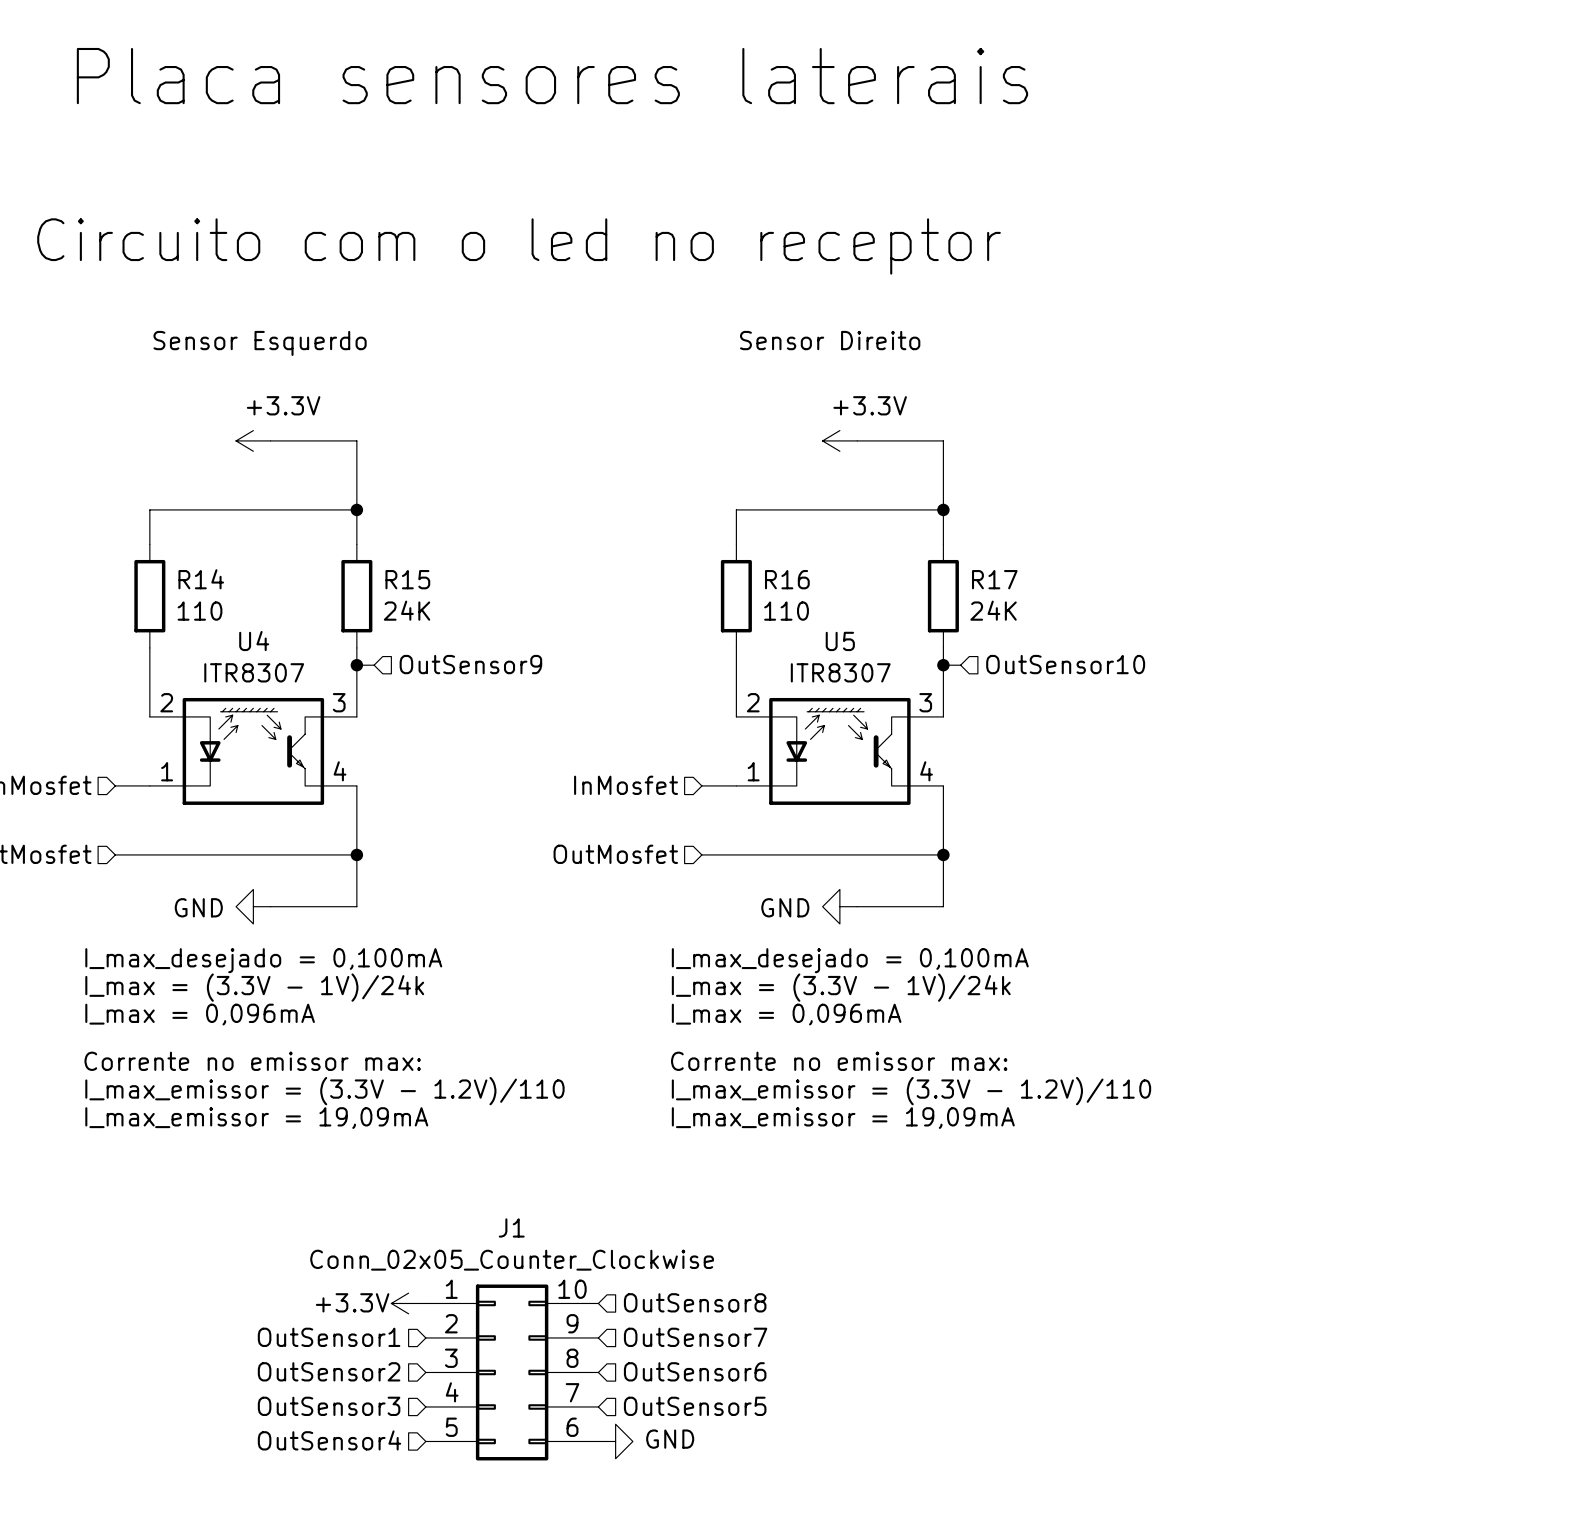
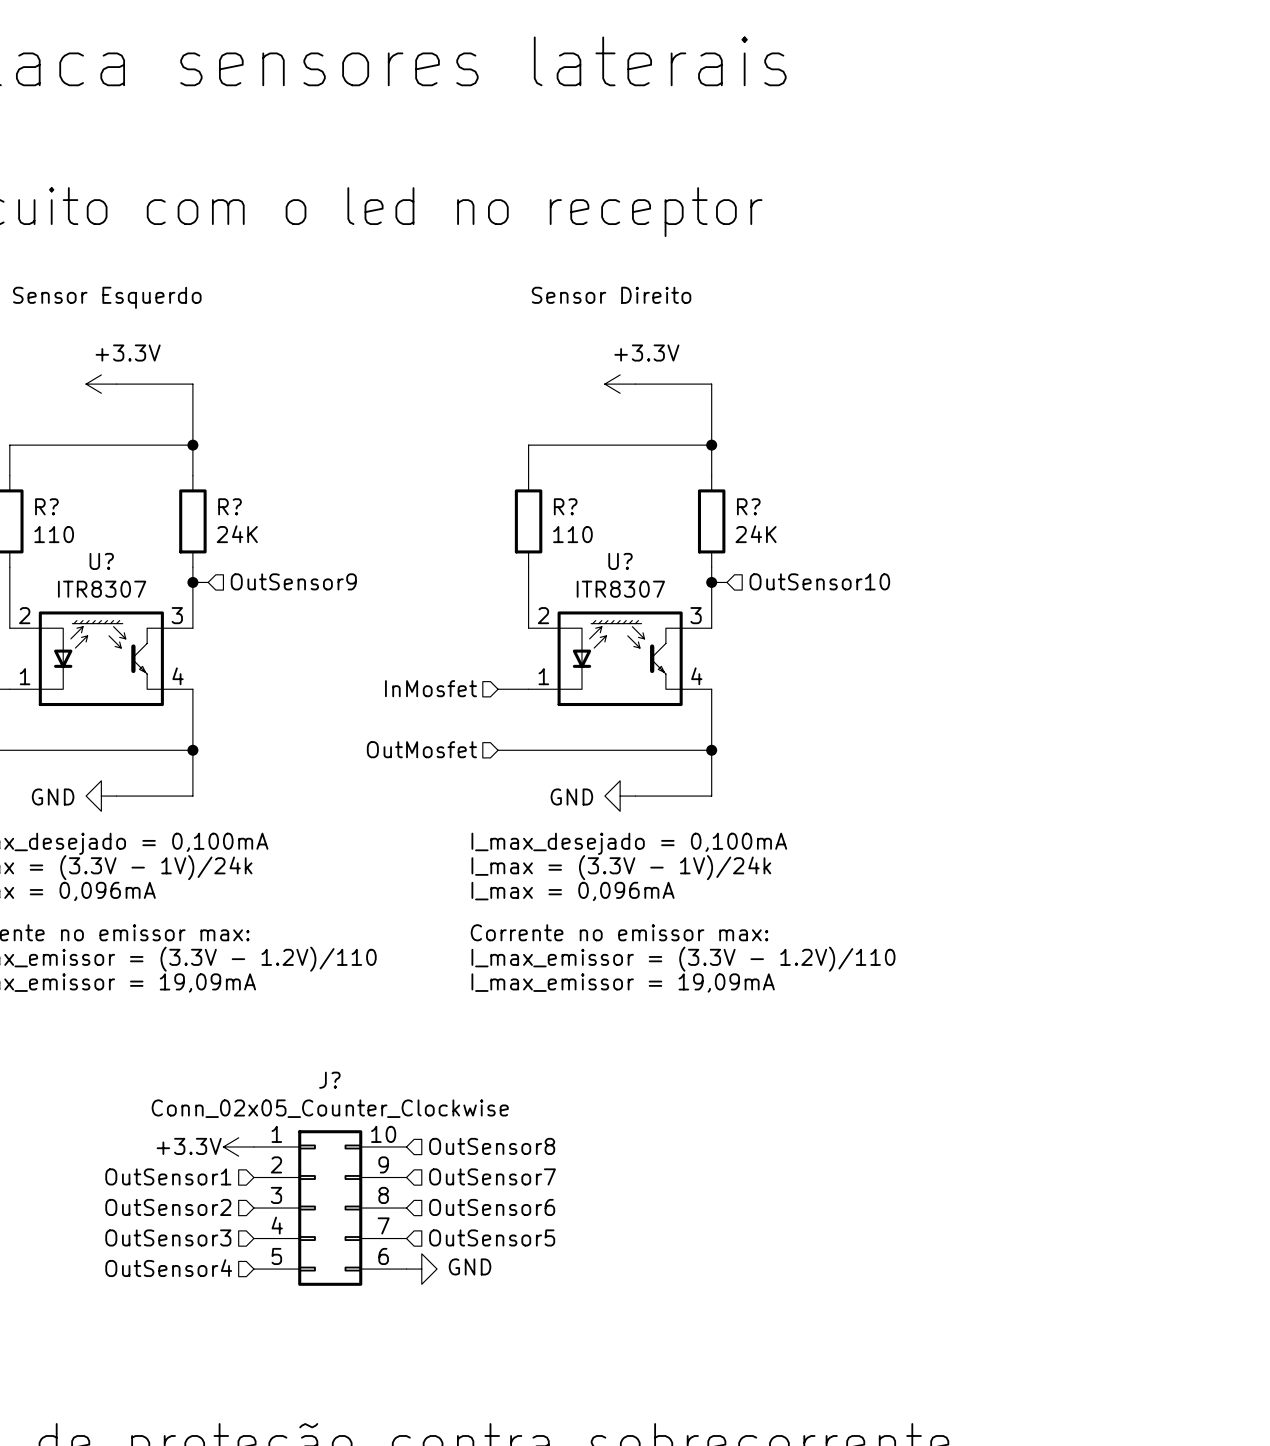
R14 name: R14 (201, 579) -> R? (46, 506)
R15 name: R15 (407, 579) -> R? (230, 506)
R16 name: R16 (787, 579) -> R? (565, 506)
R17 name: R17 (994, 579) -> R? (748, 506)
U4 name: U4 (254, 641) -> U? (101, 561)
U5 name: U5 (840, 641) -> U? (620, 561)
J1 name: J1 (511, 1227) -> J? (329, 1080)

